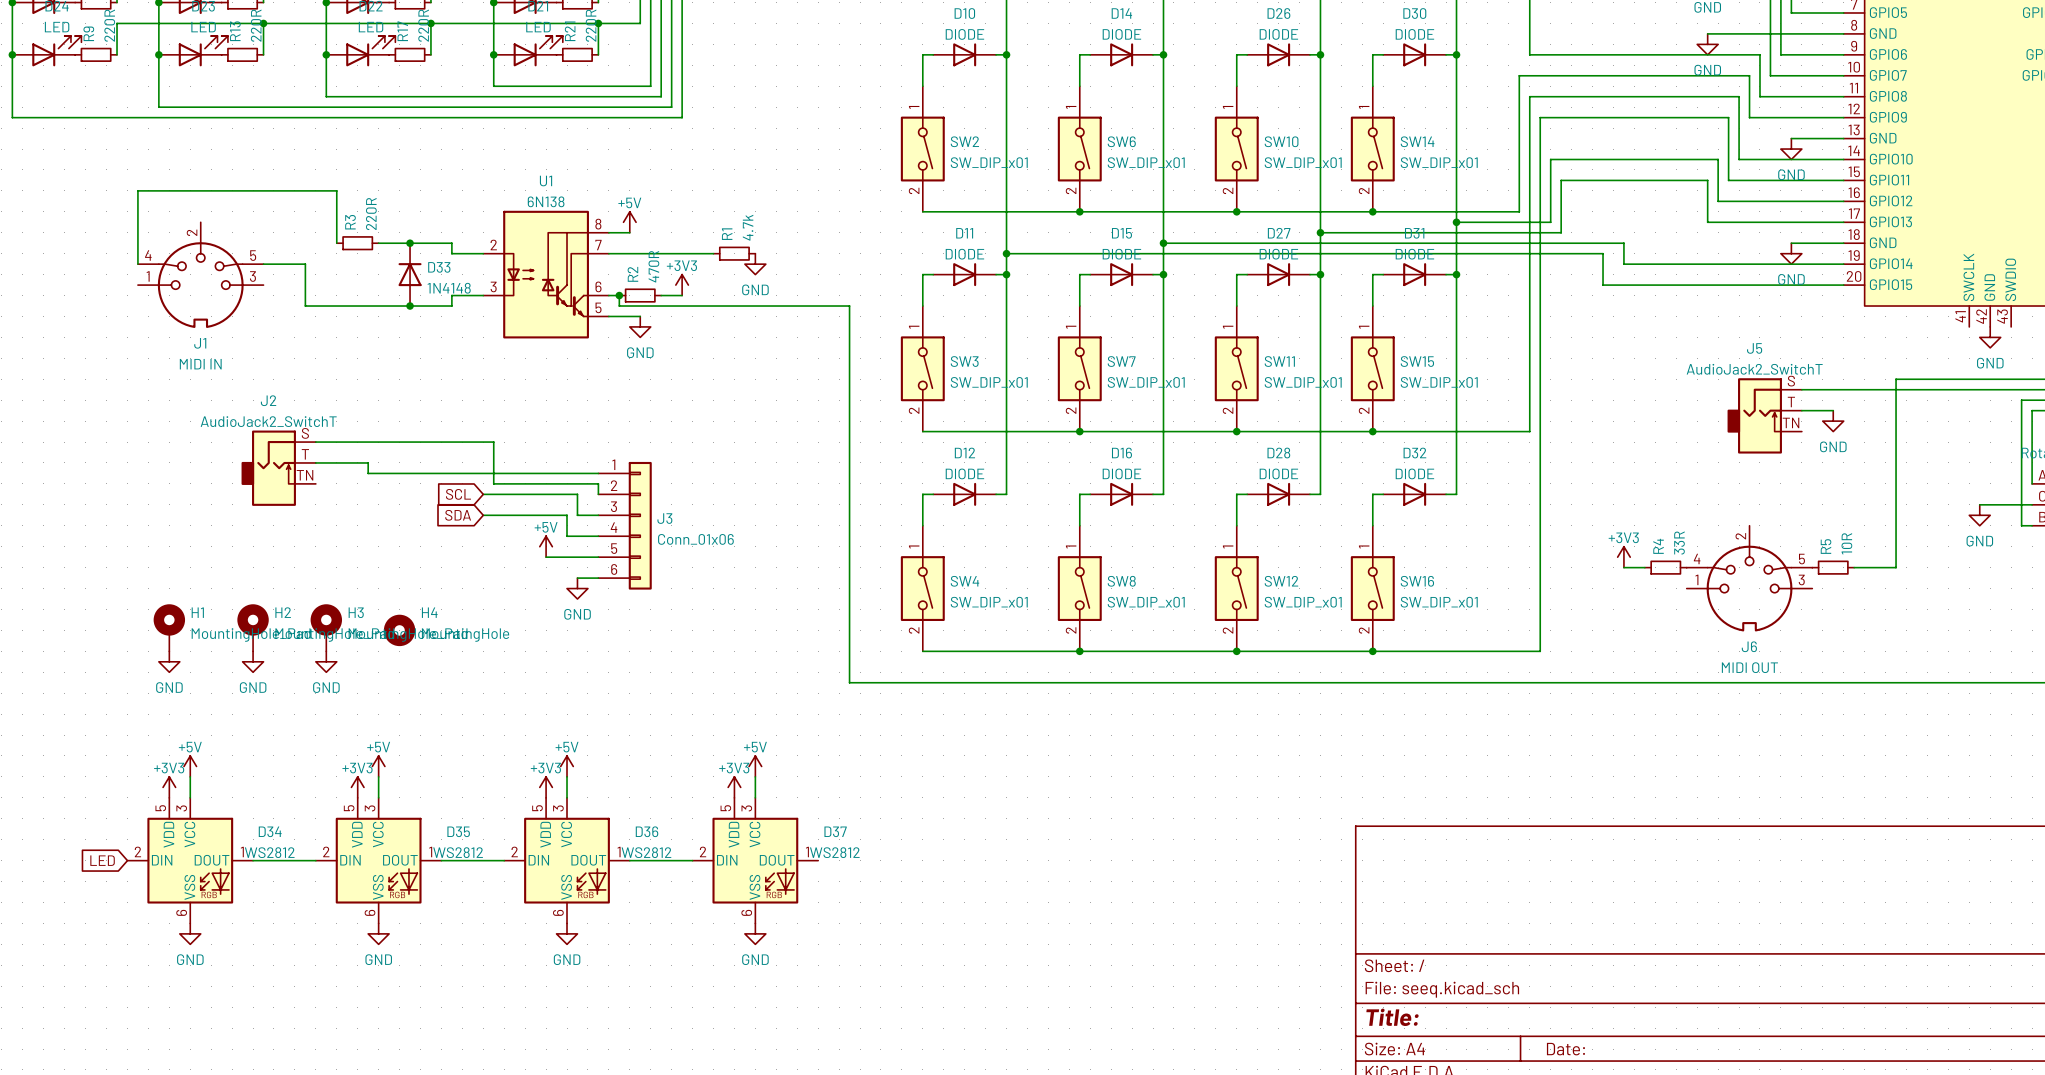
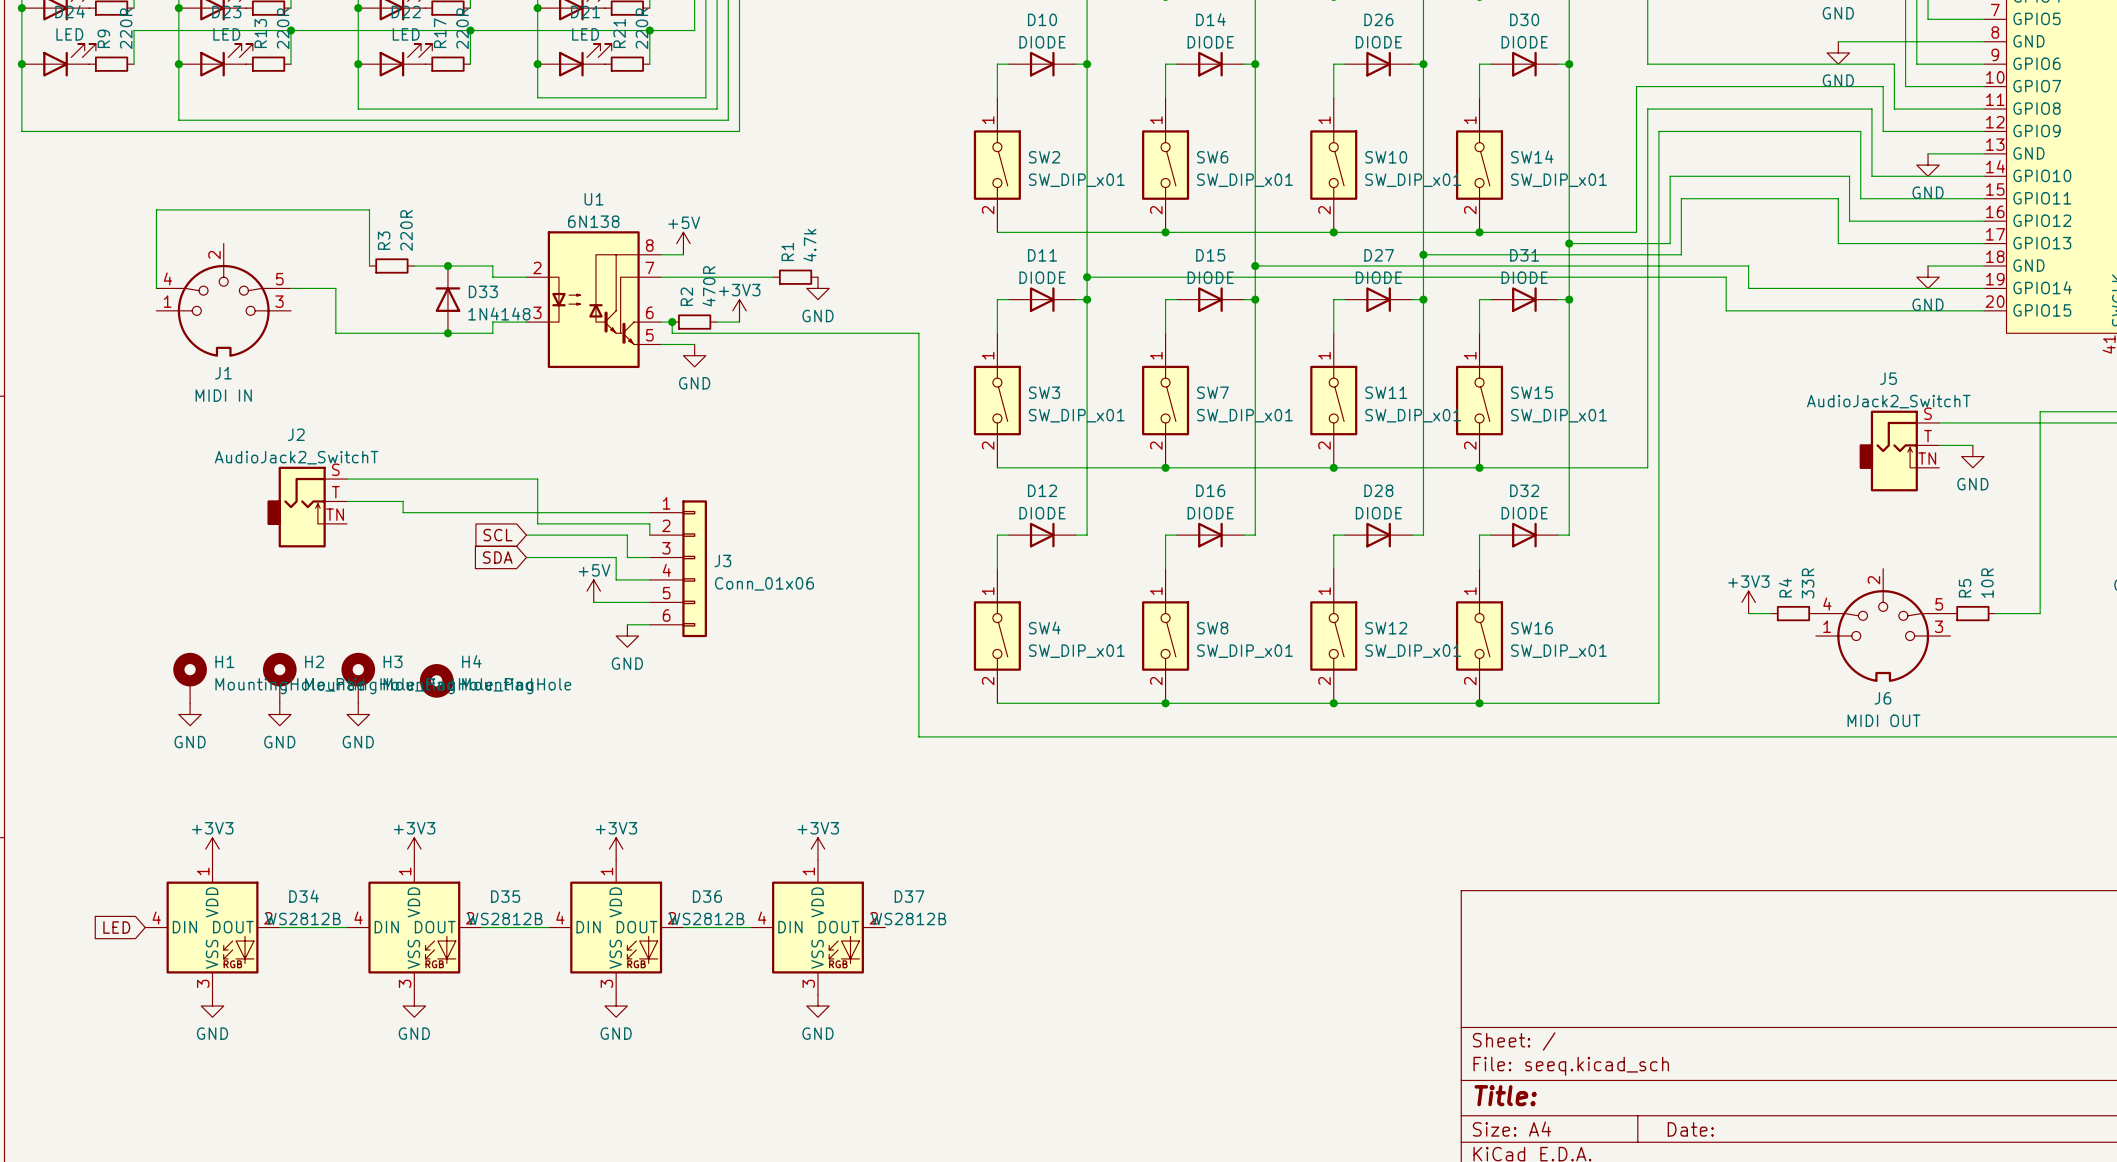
power symbol: +5V (190, 766) -> none
power symbol: +5V (378, 766) -> none
power symbol: +5V (567, 766) -> none
power symbol: +5V (755, 766) -> none
power symbol position: +3V3 (169, 787) -> +3V3 (212, 849)
power symbol position: +3V3 (357, 787) -> +3V3 (414, 849)
power symbol position: +3V3 (546, 787) -> +3V3 (616, 849)
power symbol position: +3V3 (734, 787) -> +3V3 (817, 849)
D34 symbol: [127, 797, 254, 924] -> [145, 860, 280, 995]
D35 symbol: [315, 797, 442, 924] -> [347, 860, 482, 995]
D36 symbol: [504, 797, 630, 924] -> [548, 860, 684, 995]
D37 symbol: [692, 797, 819, 924] -> [750, 860, 886, 995]
D34 value: WS2812 (269, 852) -> WS2812B (303, 918)
D35 value: WS2812 (458, 852) -> WS2812B (505, 918)
D36 value: WS2812 (646, 852) -> WS2812B (706, 918)
D37 value: WS2812 (834, 852) -> WS2812B (908, 918)

